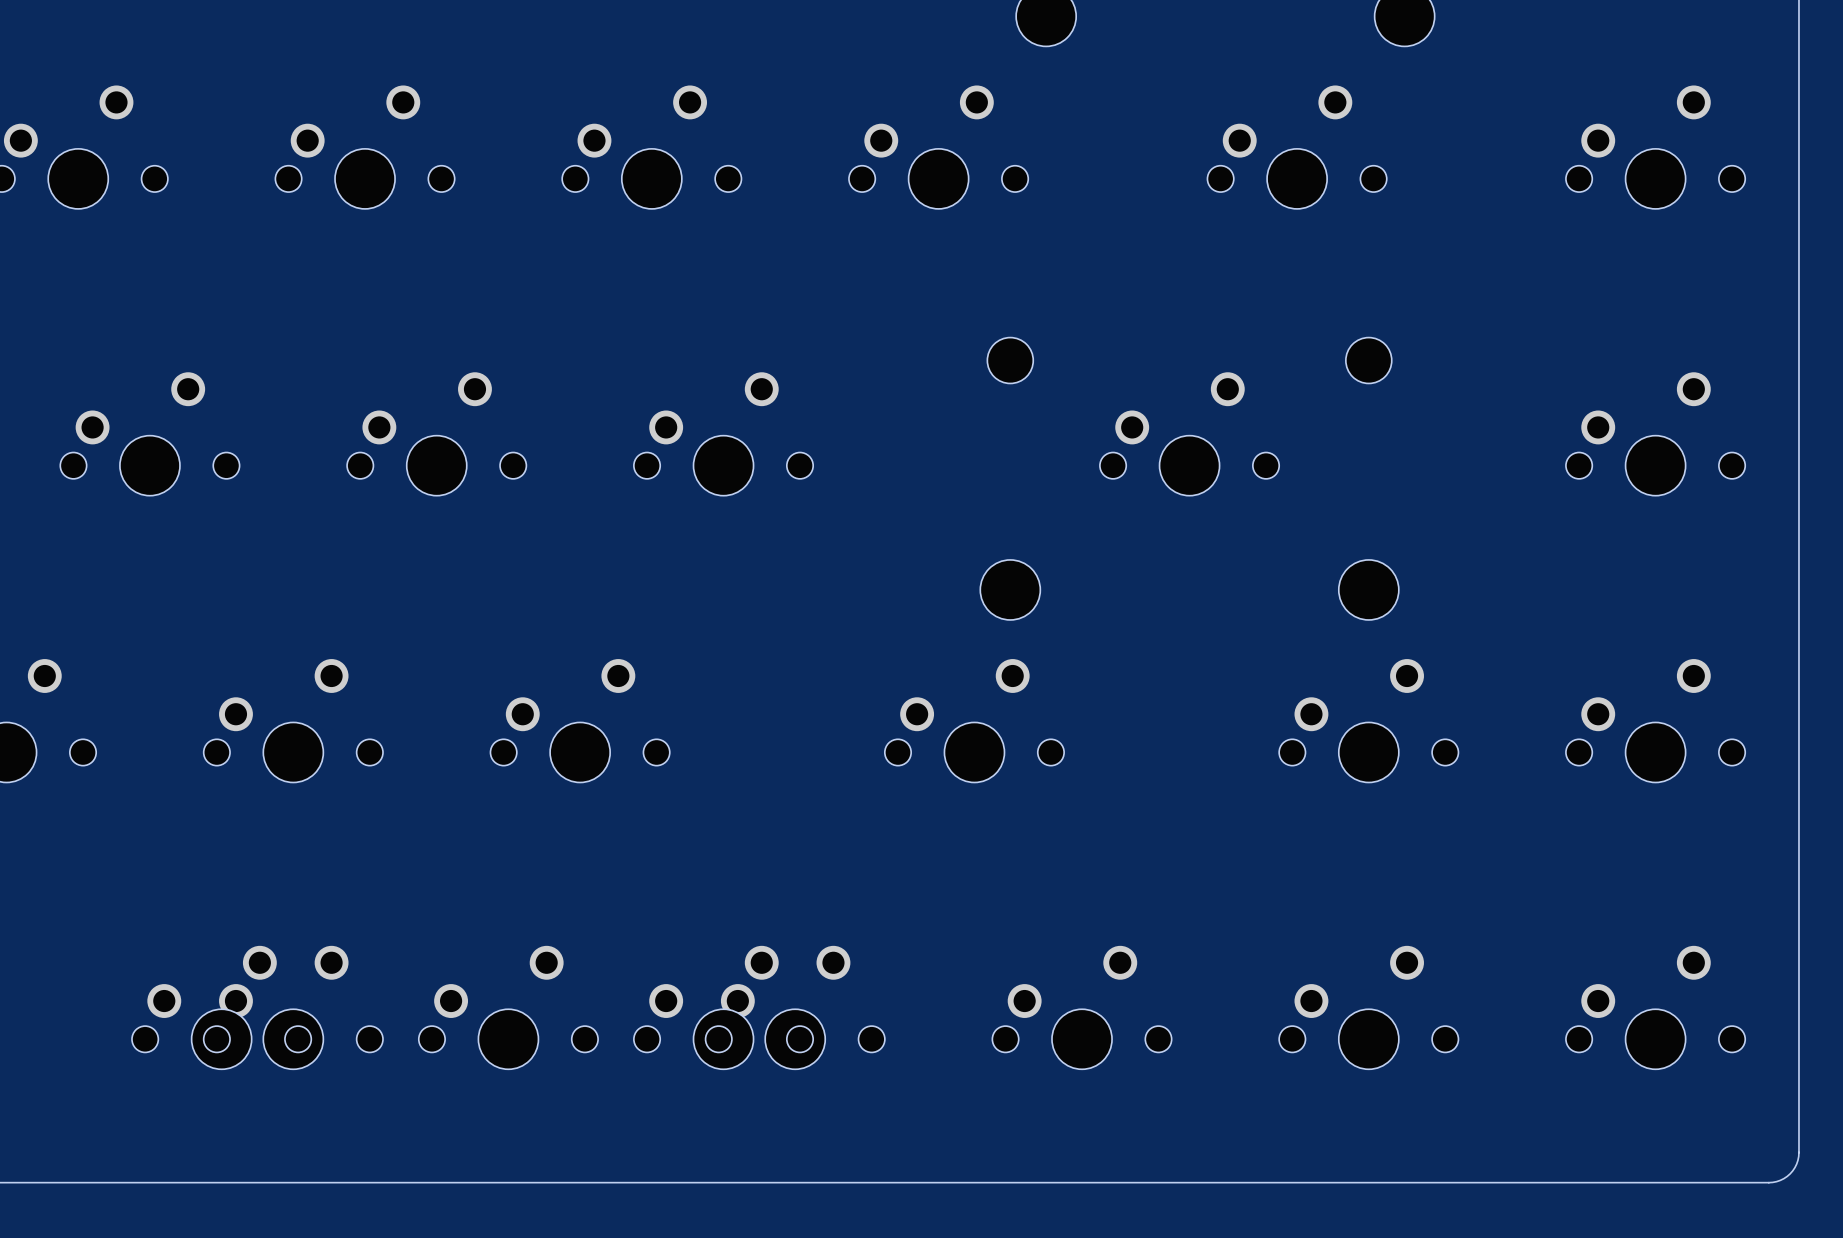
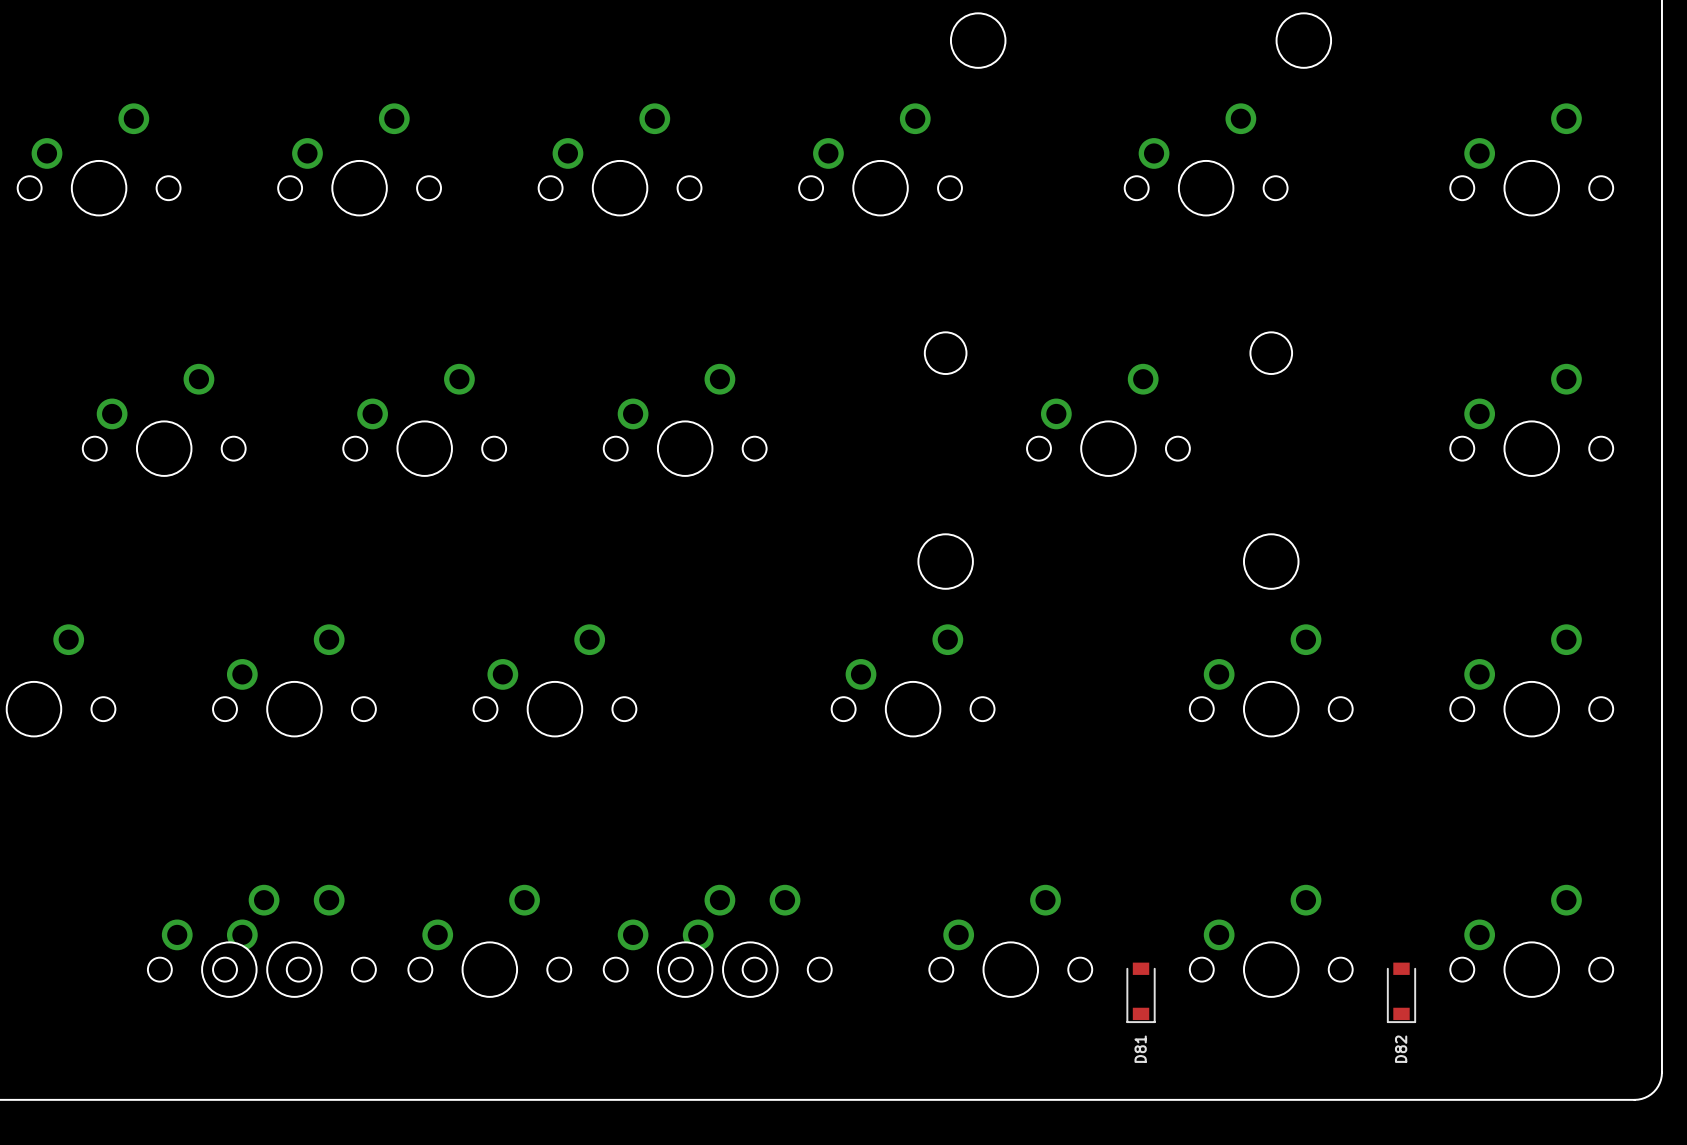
D81: none -> (1141, 992)
D82: none -> (1401, 992)

